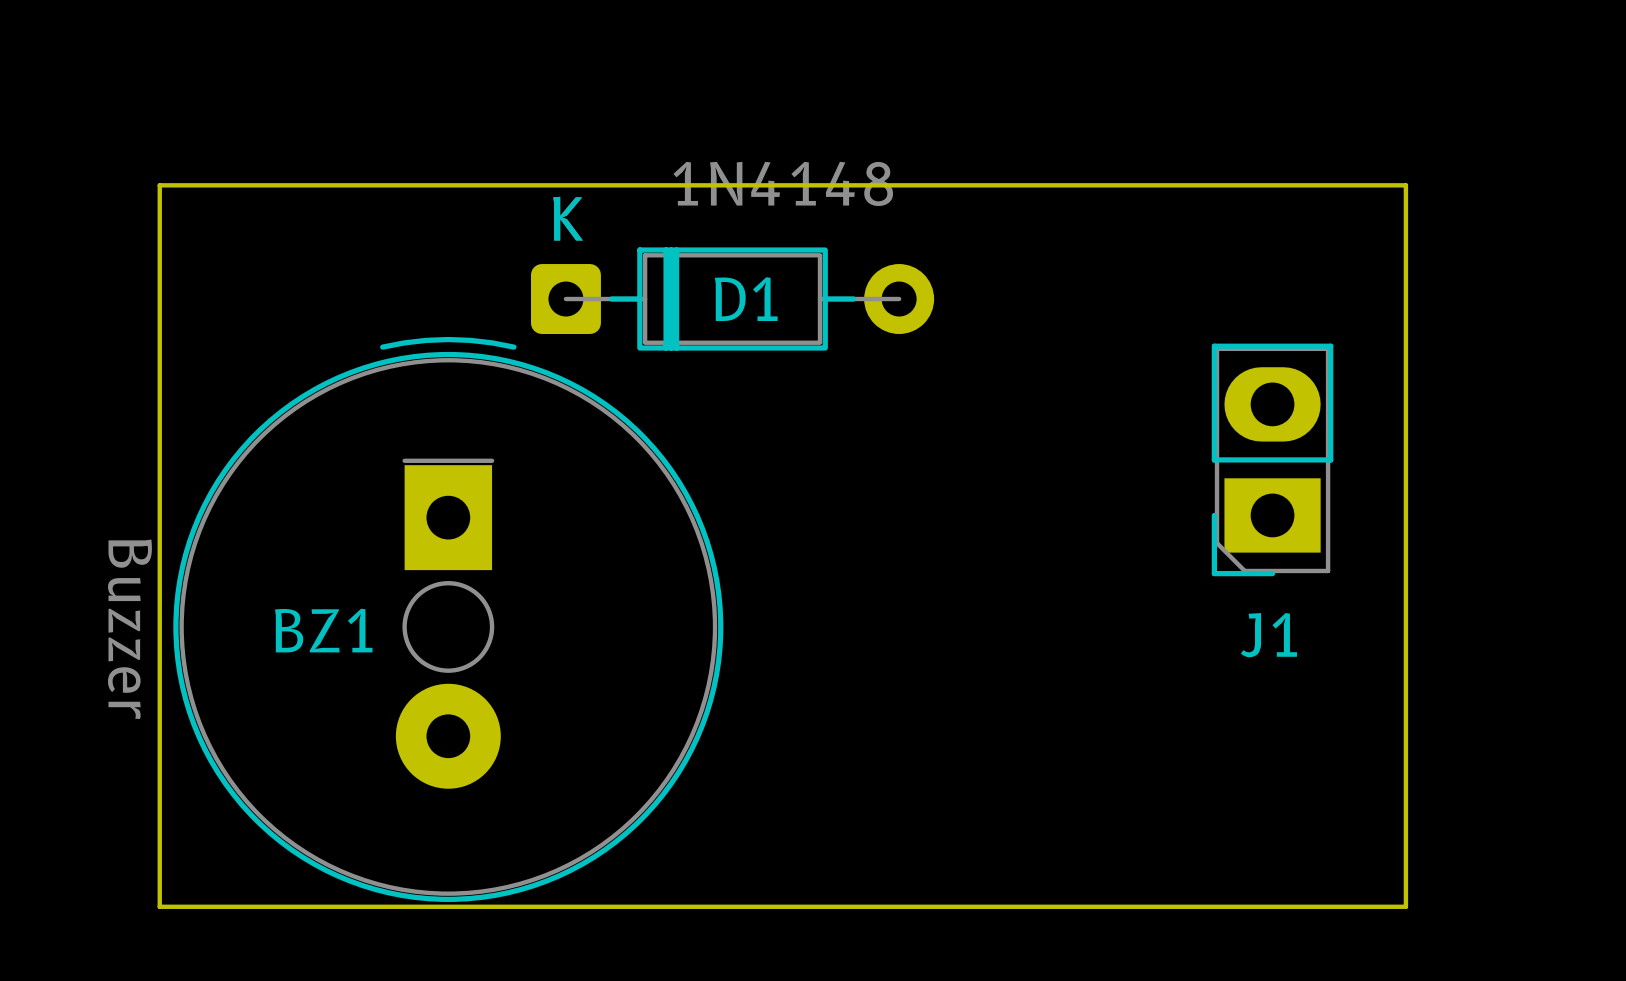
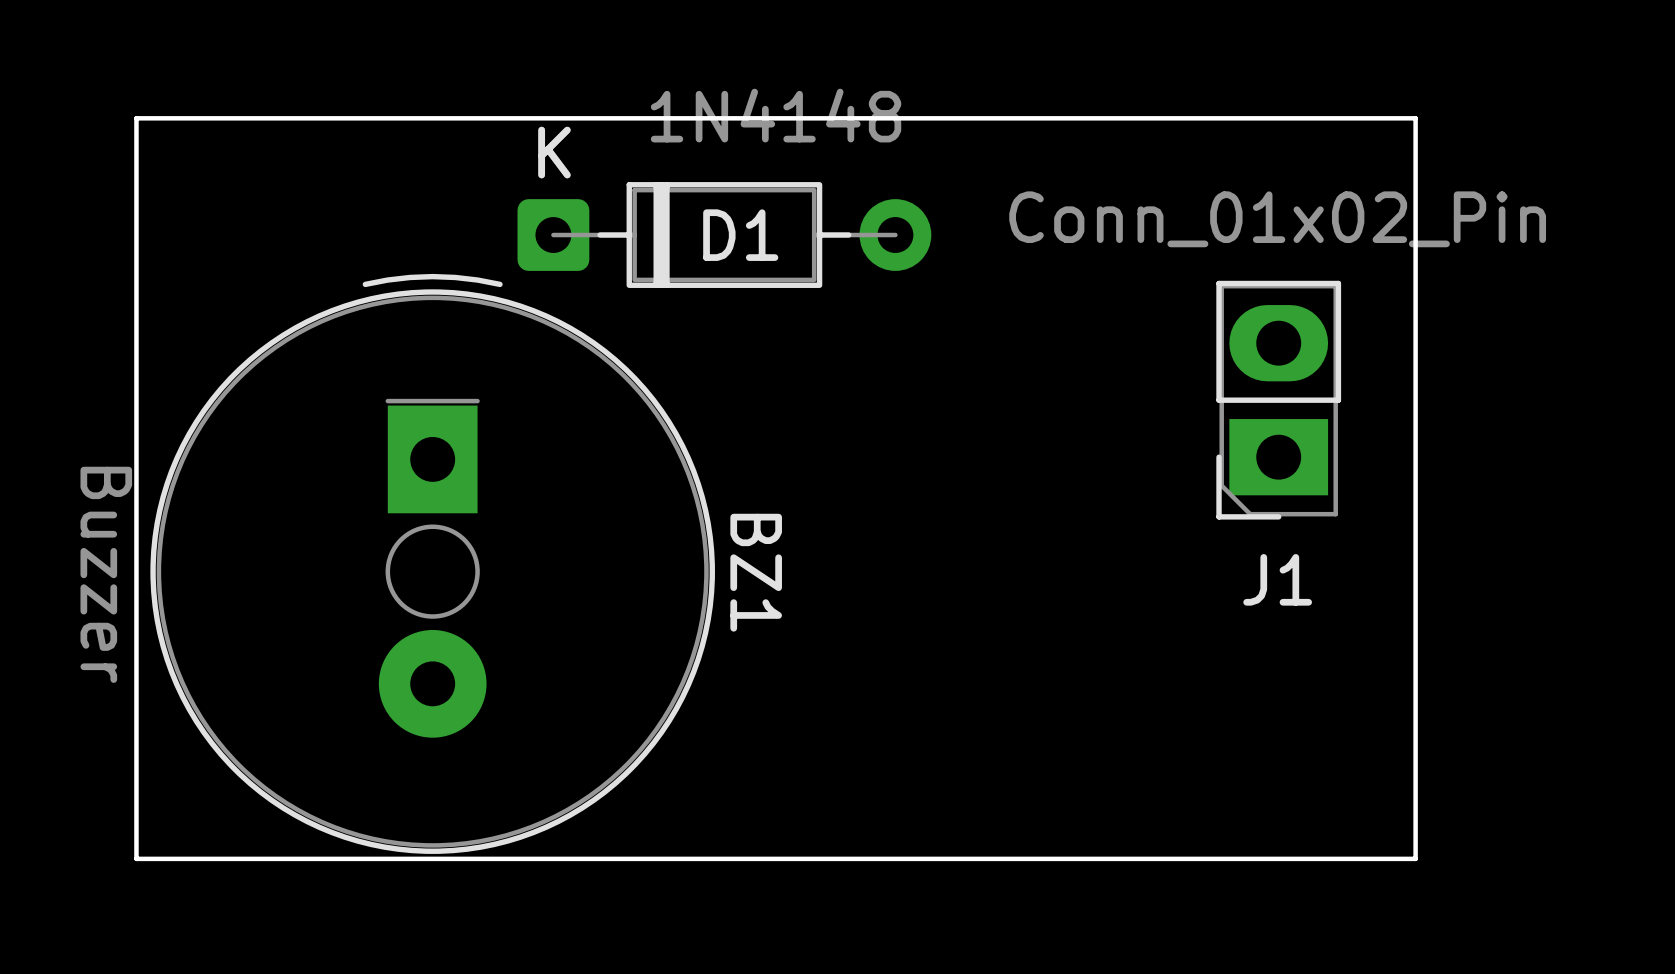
J1 value: none -> Conn_01x02_Pin (1277, 219)
BZ1 name rotation: 0° (323, 630) -> 90° clockwise (756, 572)
BZ1 name position: BZ1 (323, 630) -> BZ1 (756, 572)

